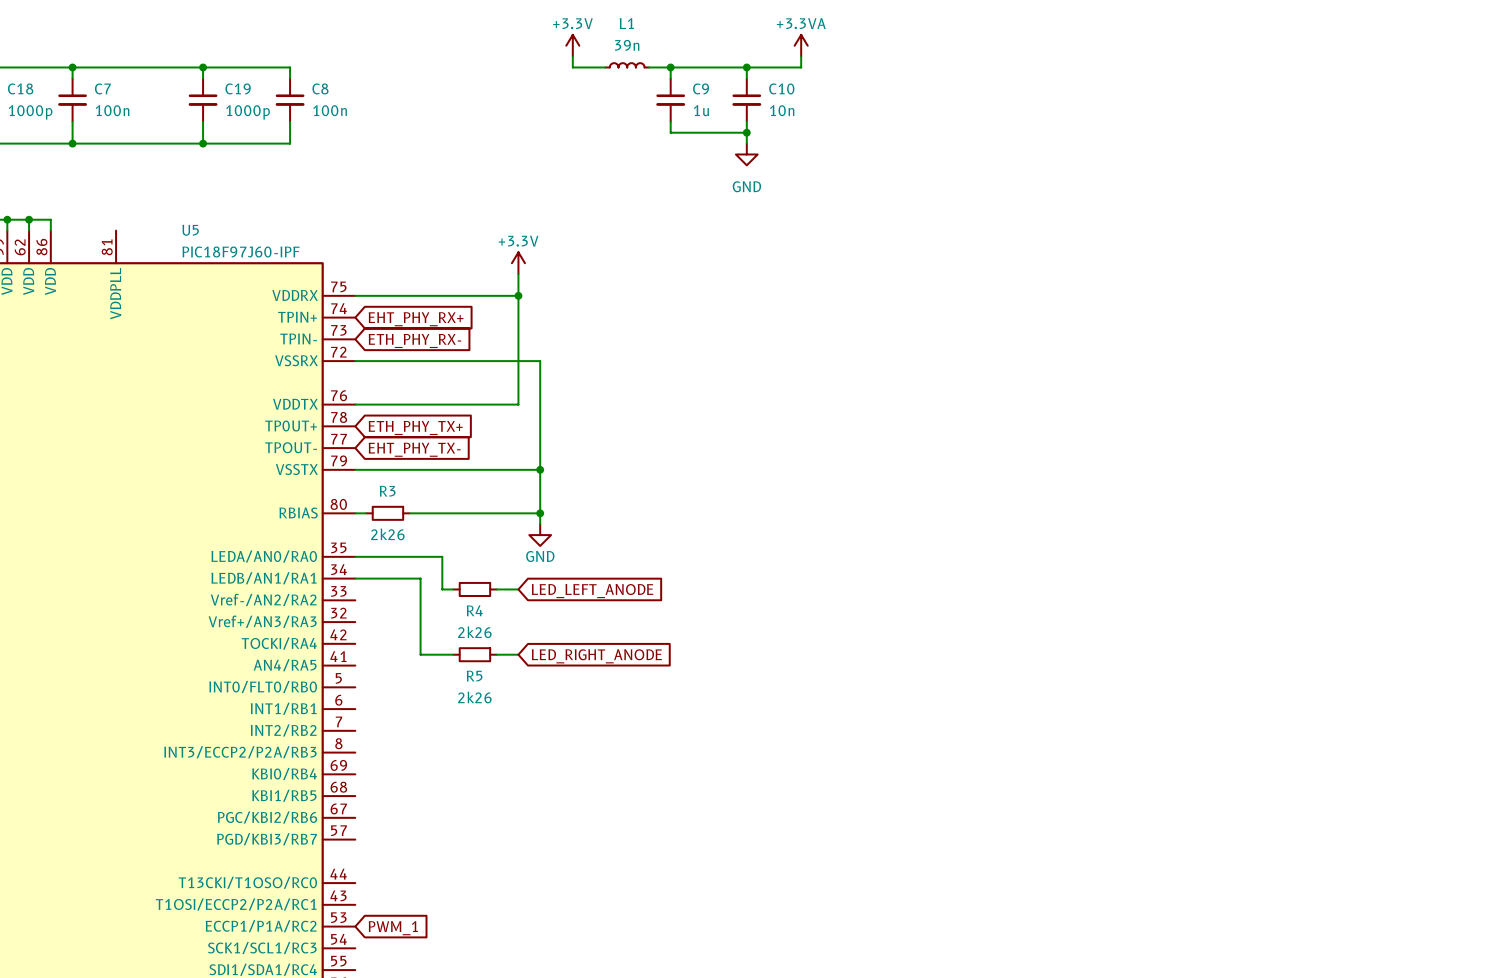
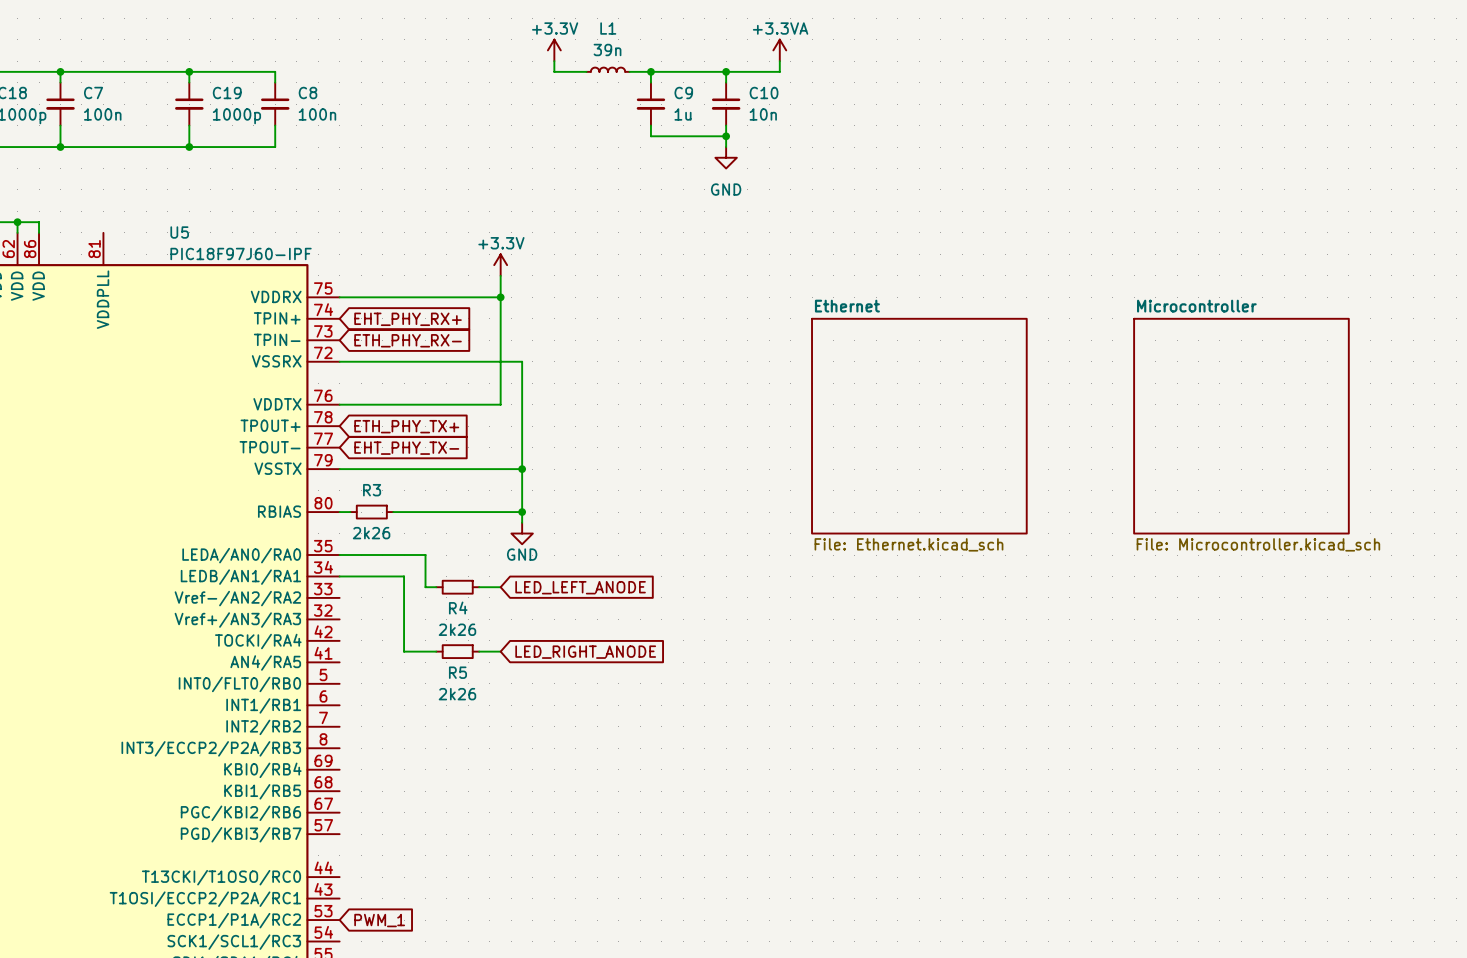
sheet Ethernet: none -> File: Ethernet.kicad_sch (919, 426)
sheet Microcontroller: none -> File: Microcontroller.kicad_sch (1241, 426)

